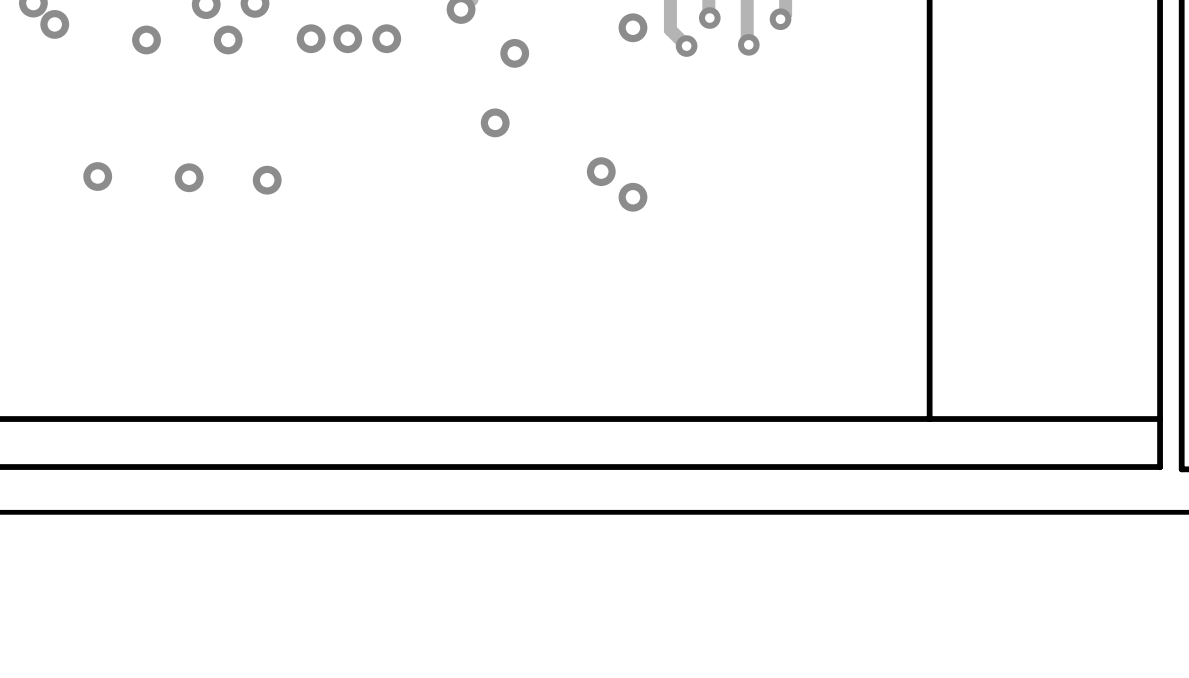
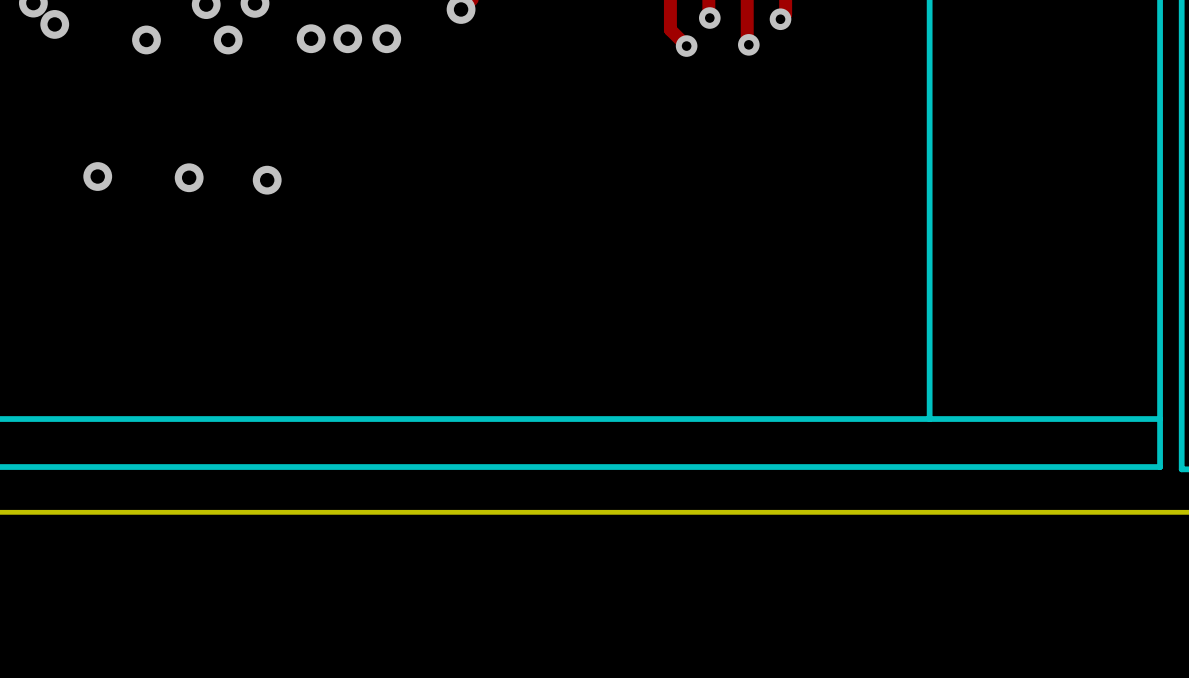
via: (632, 27) -> none
via: (514, 53) -> none
via: (495, 122) -> none
via: (601, 171) -> none
via: (632, 197) -> none

